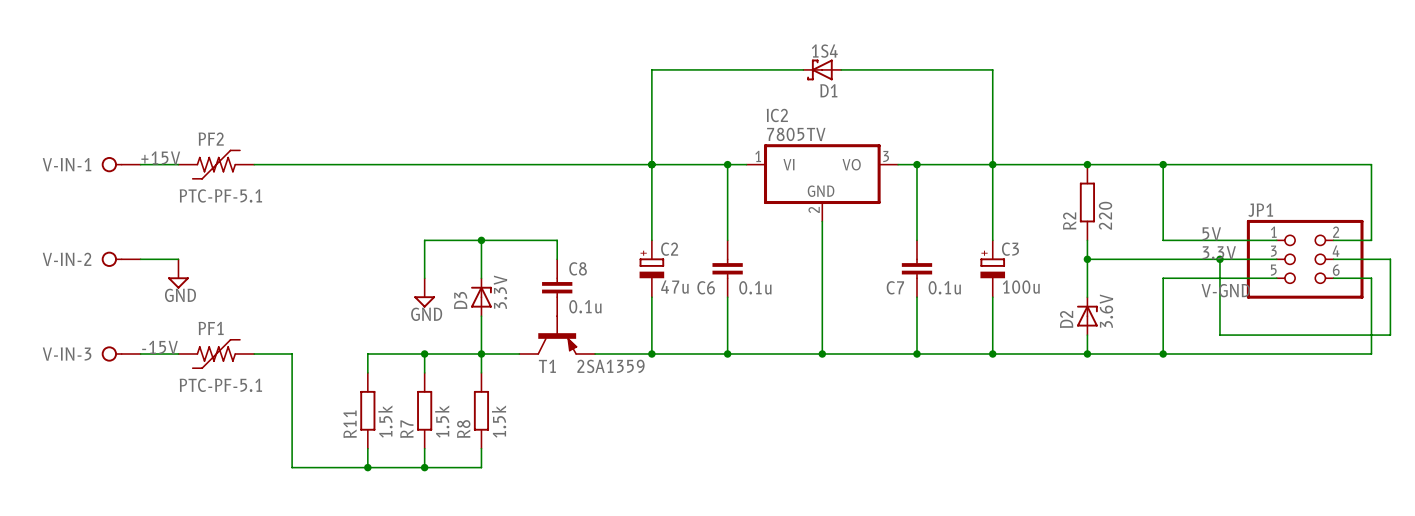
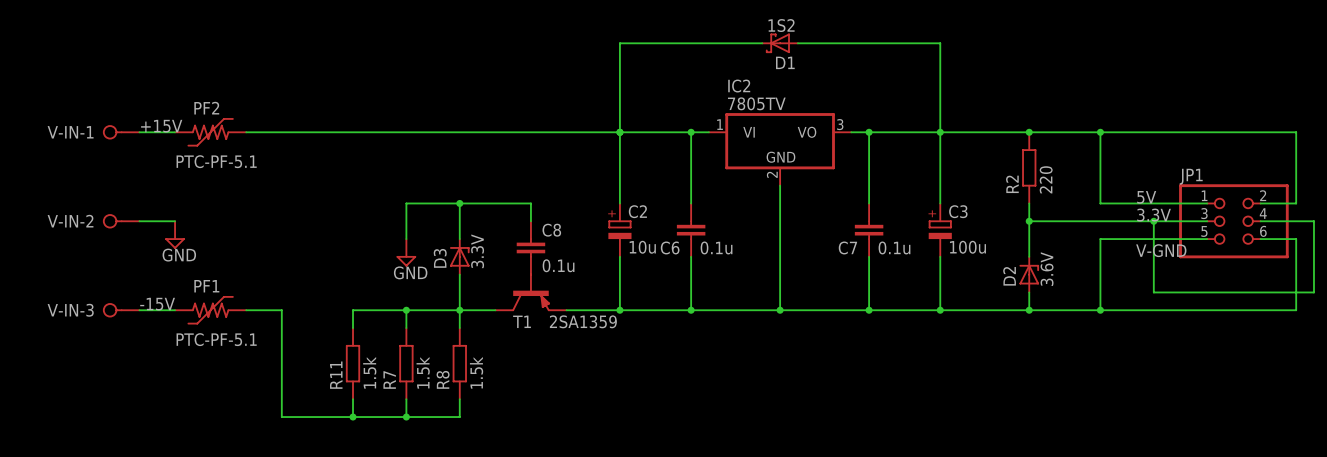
D1 value: 1S4 (824, 51) -> 1S2 (781, 25)
C2 value: 47u (674, 287) -> 10u (642, 247)

